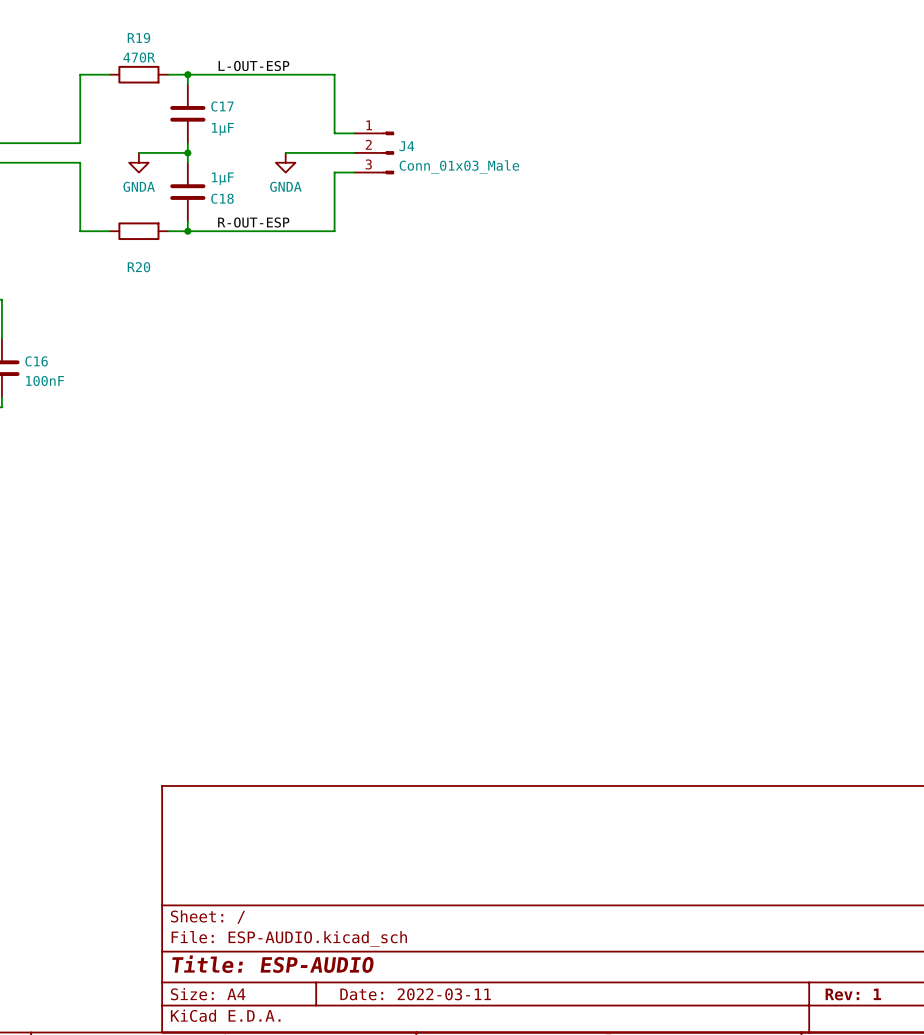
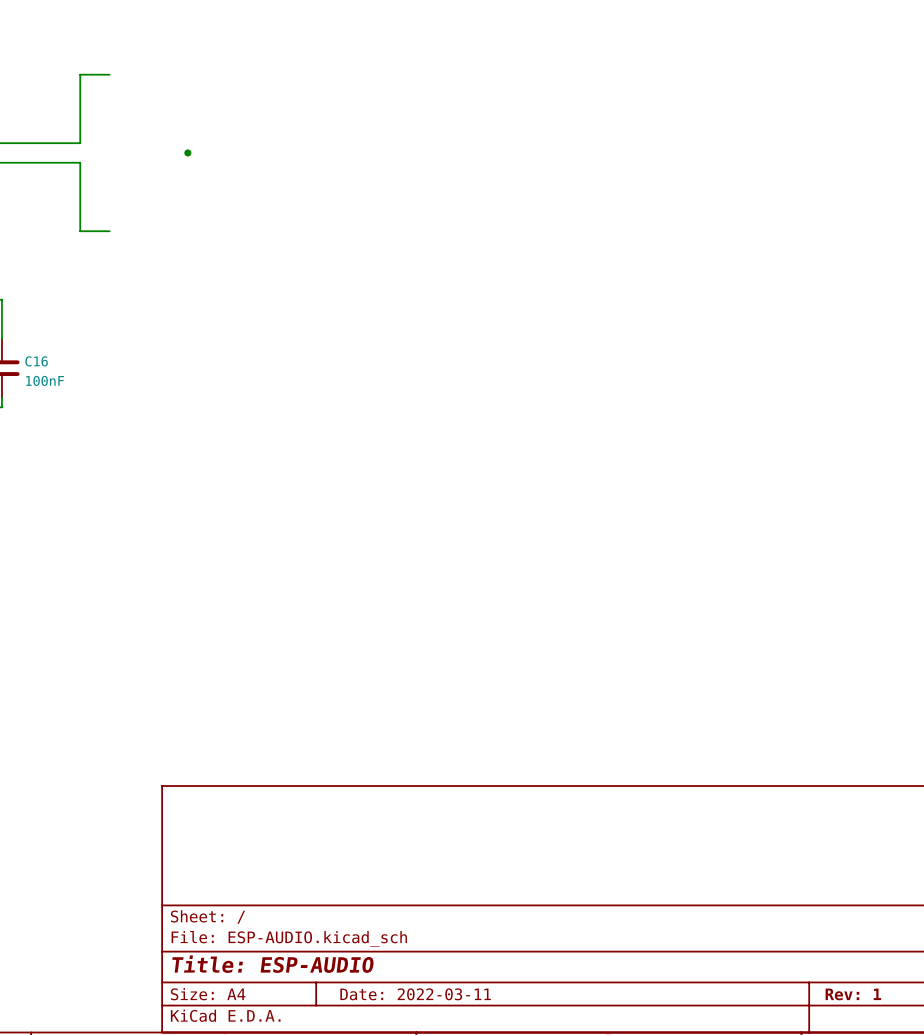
label: L-OUT-ESP (253, 65) -> none
R19: 470R (138, 74) -> none
wire: (168, 74) (334, 74) (334, 133) (354, 133) -> none
wire: (187, 74) (187, 84) -> none
junction: (187, 74) -> none
C17: 1µF (187, 113) -> none
wire: (187, 143) (187, 162) -> none
wire: (138, 152) (187, 152) -> none
wire: (285, 152) (354, 152) -> none
J4: Conn_01x03_Male (374, 152) -> none
power symbol: GNDA (138, 162) -> none
power symbol: GNDA (285, 162) -> none
wire: (354, 172) (334, 172) (334, 231) (168, 231) -> none
C18: 1µF (187, 192) -> none
wire: (187, 221) (187, 231) -> none
label: R-OUT-ESP (253, 222) -> none
R20: (138, 231) -> none
junction: (187, 231) -> none

